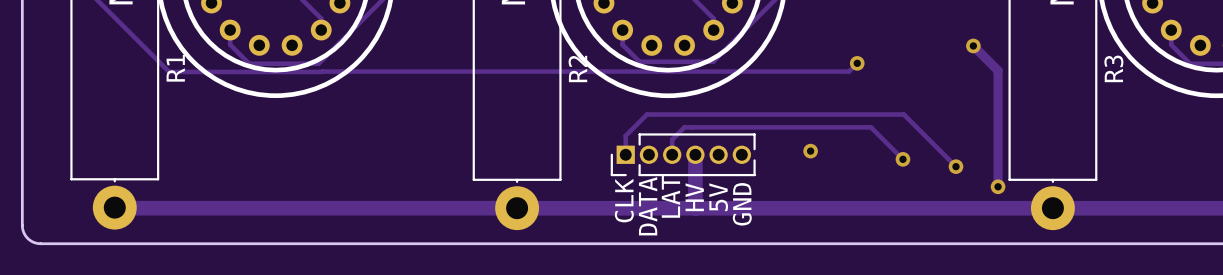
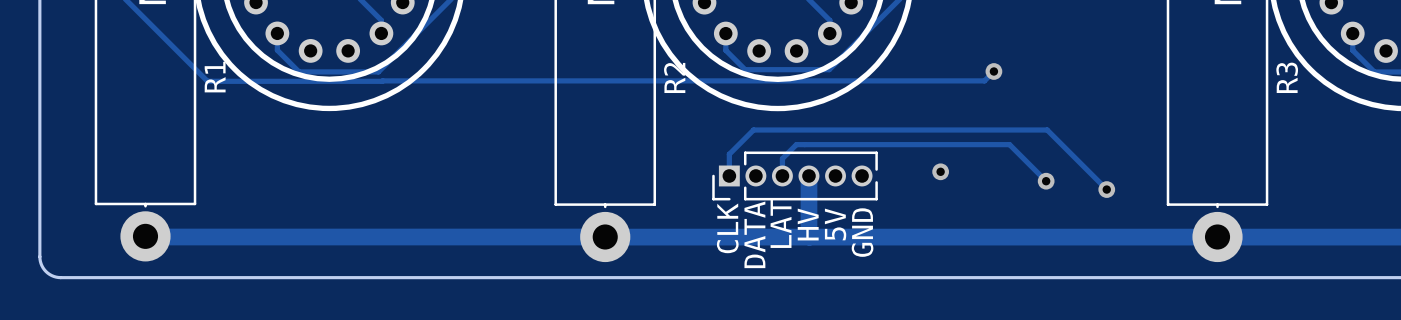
track: (973, 45) (998, 70) (998, 186) -> none
via: (973, 45) -> none
via: (998, 186) -> none

